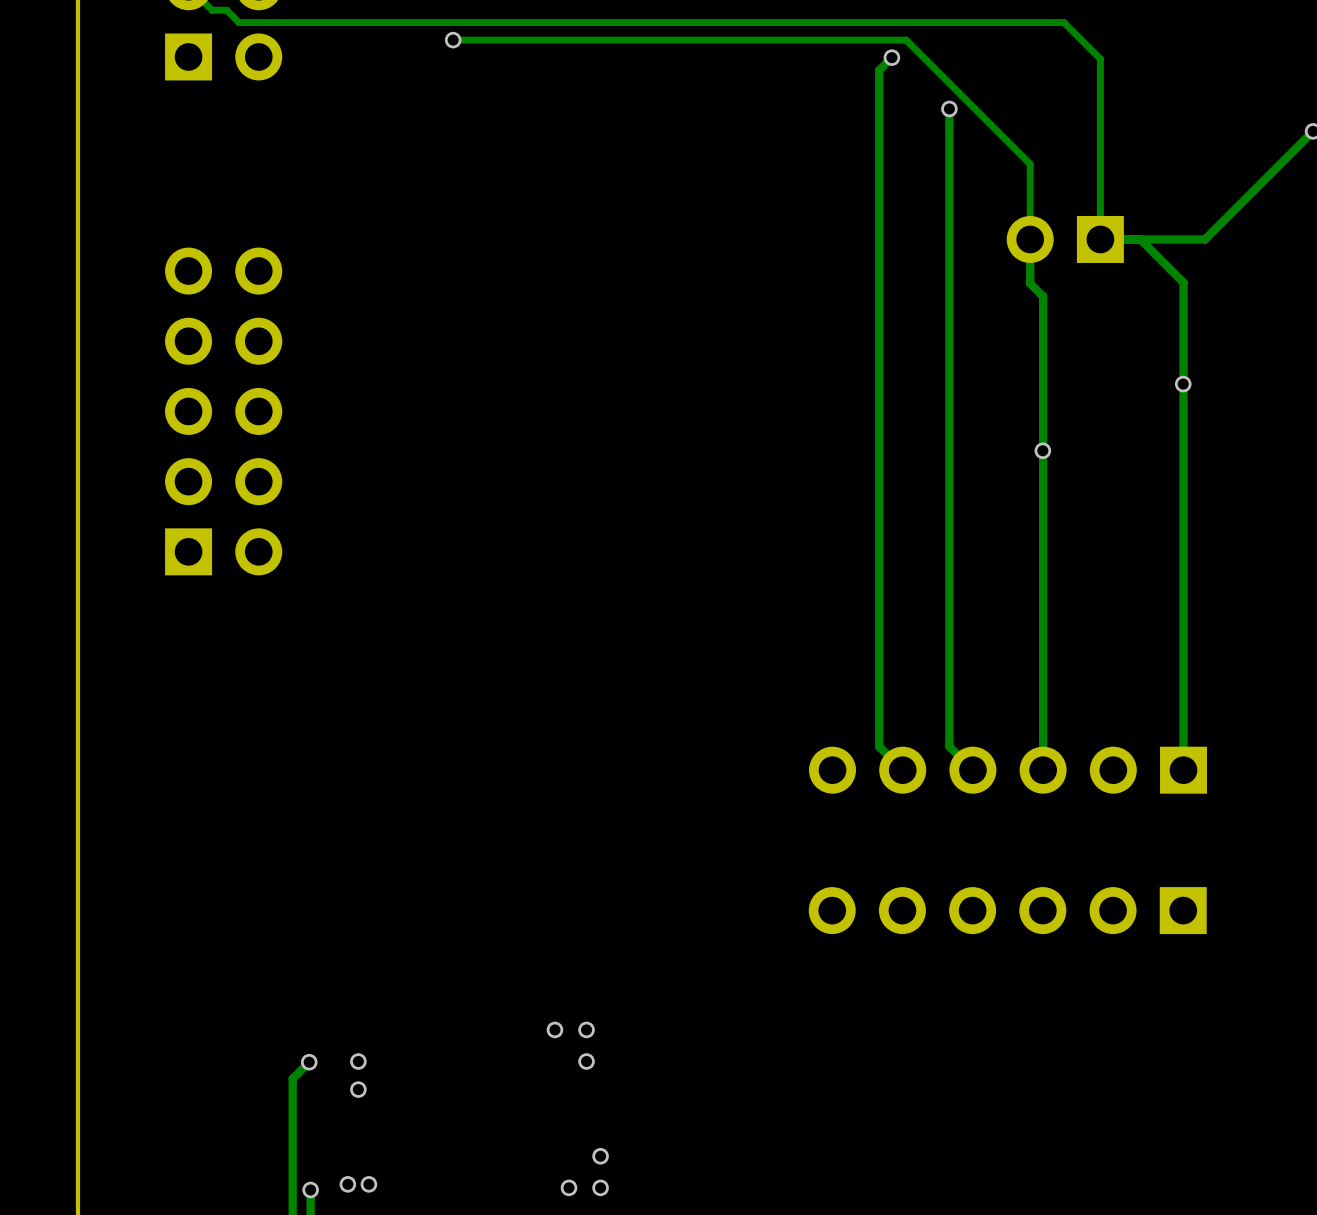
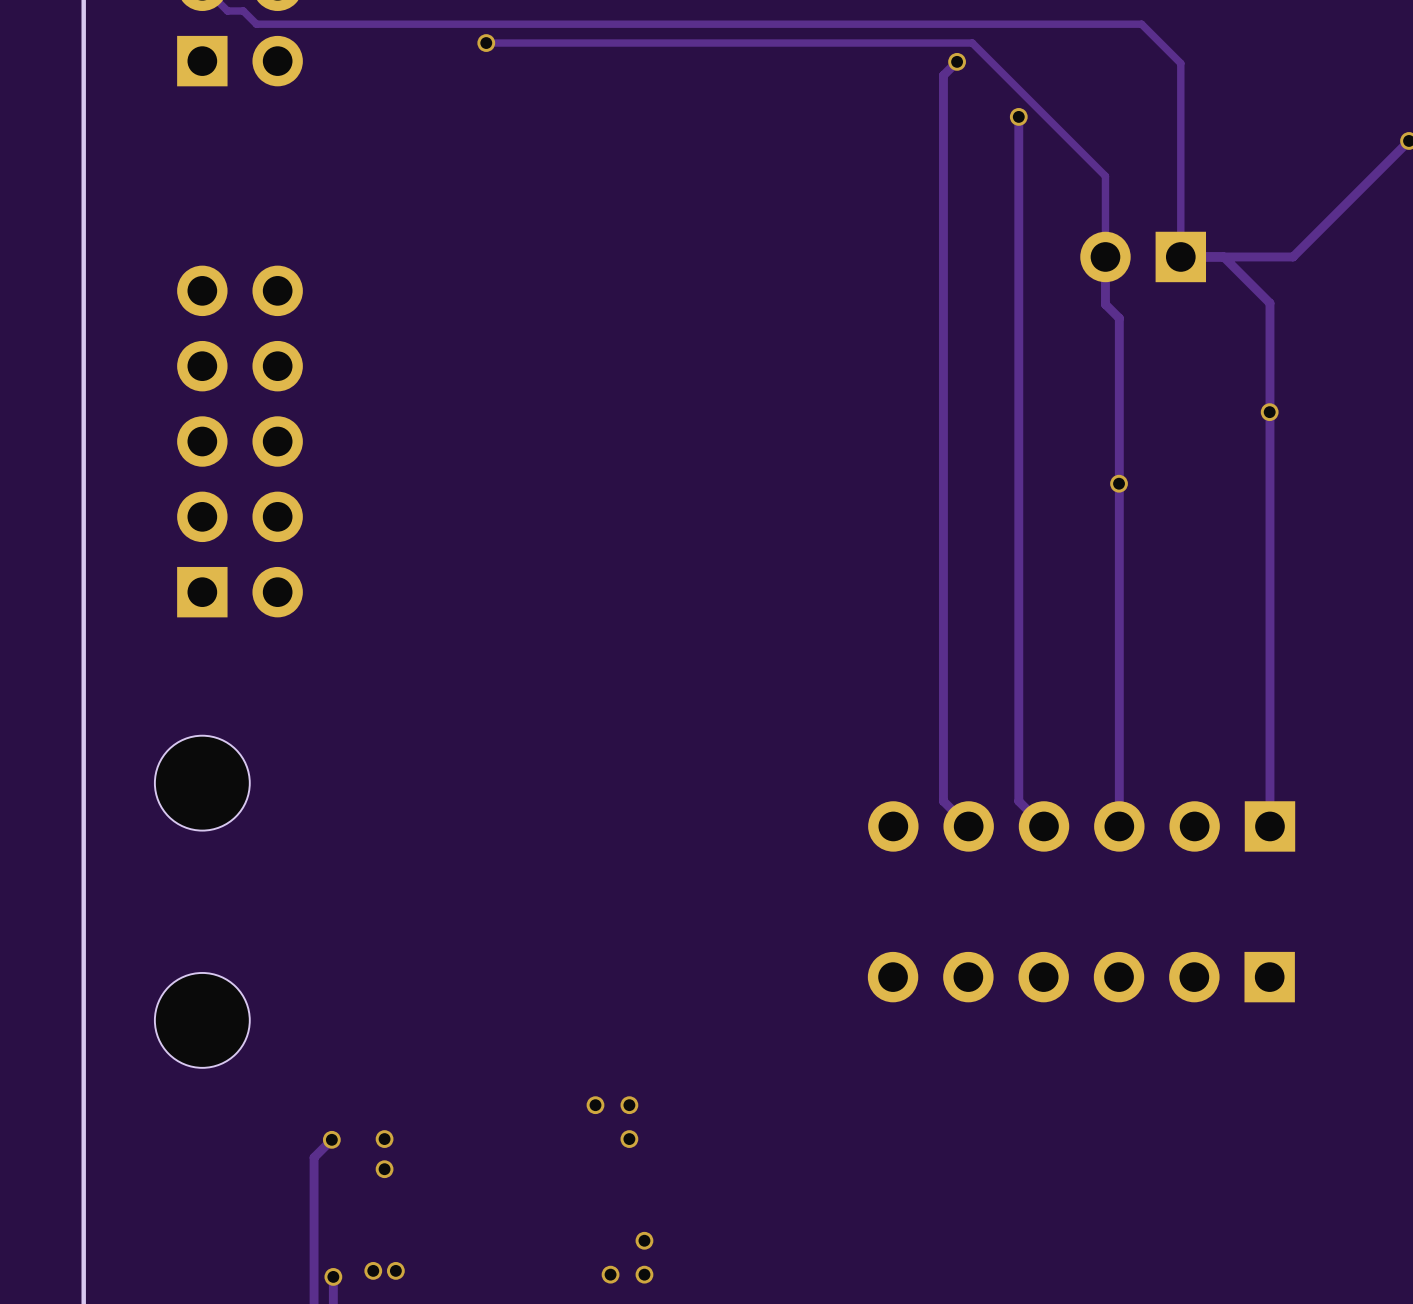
part: none -> (202, 783)
part: none -> (202, 1020)

